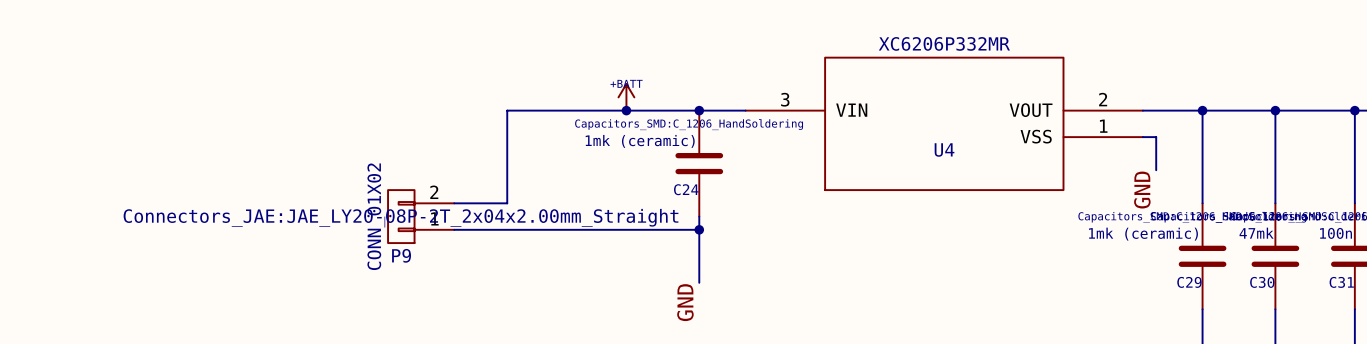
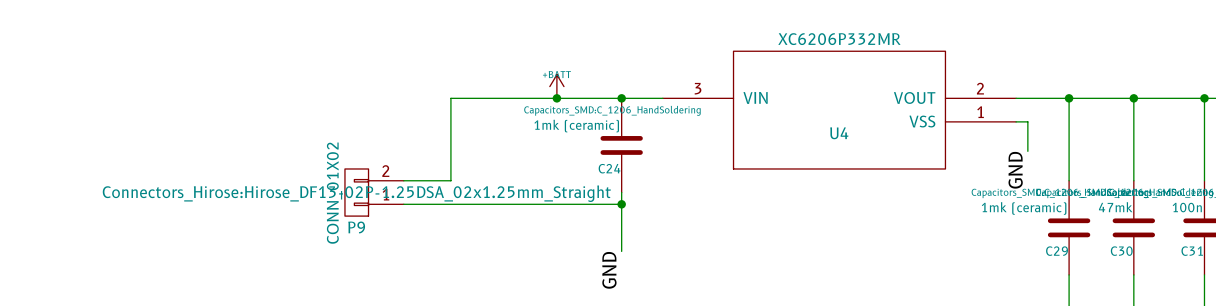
P9 text: Connectors_JAE:JAE_LY20-08P-2T_2x04x2.00mm_Straight (401, 217) -> Connectors_Hirose:Hirose_DF13-02P-1.25DSA_02x1.25mm_Straight (356, 193)

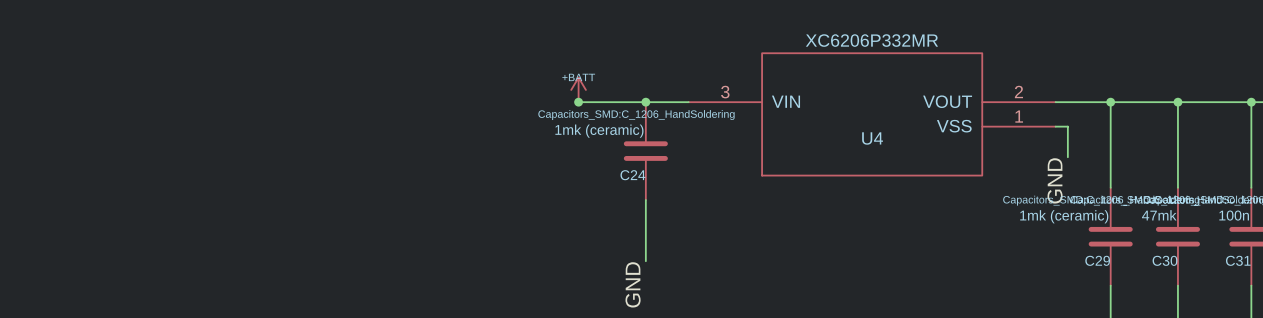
wire: (556, 98) (450, 98) (450, 180) (403, 180) -> none
P9: CONN_01X02 (374, 192) -> none
wire: (403, 204) (621, 204) -> none
junction: (621, 204) -> none

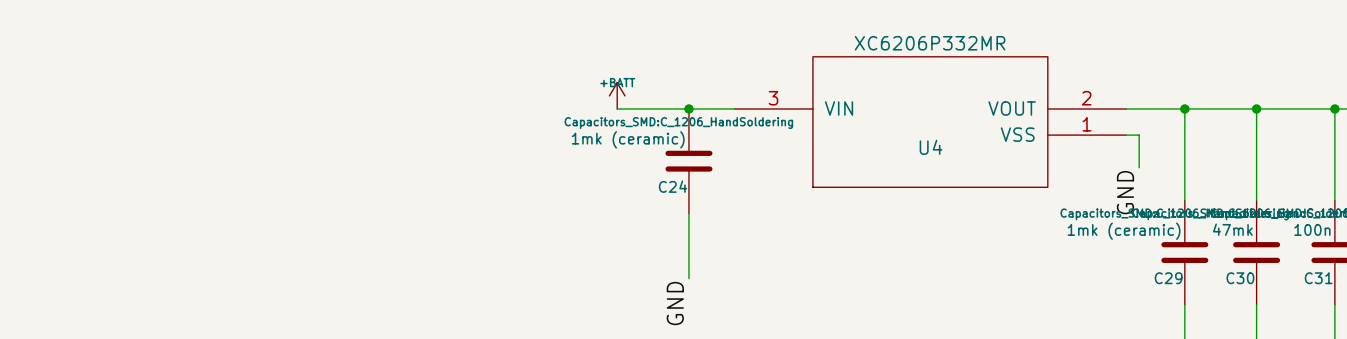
junction: (578, 102) -> none

